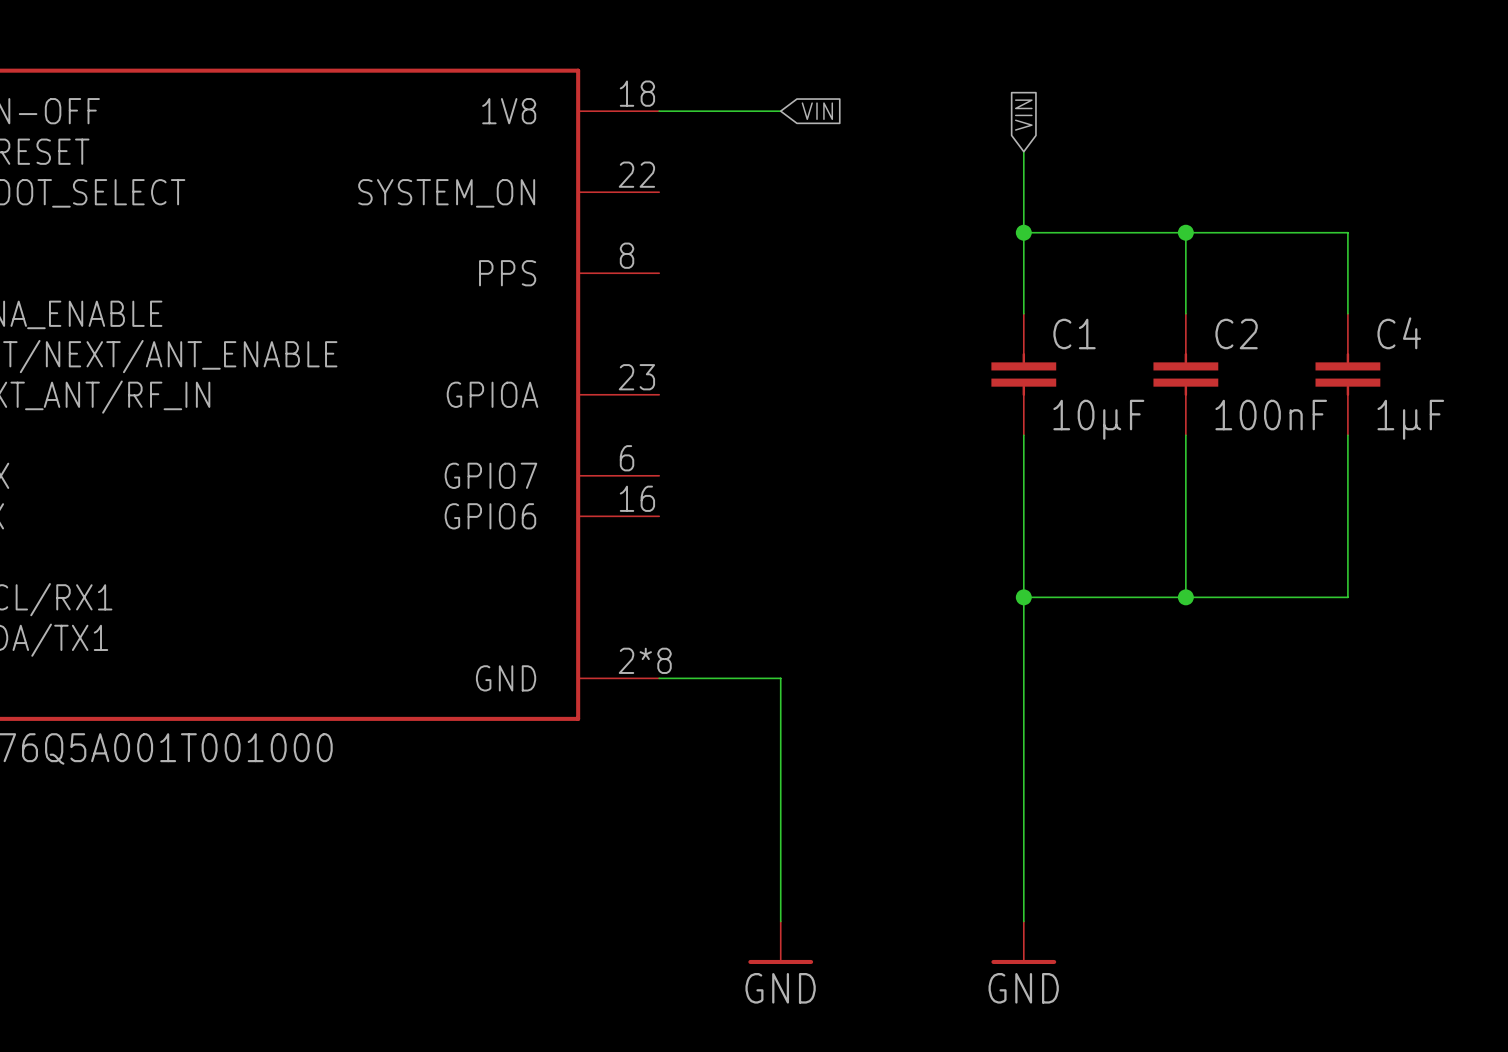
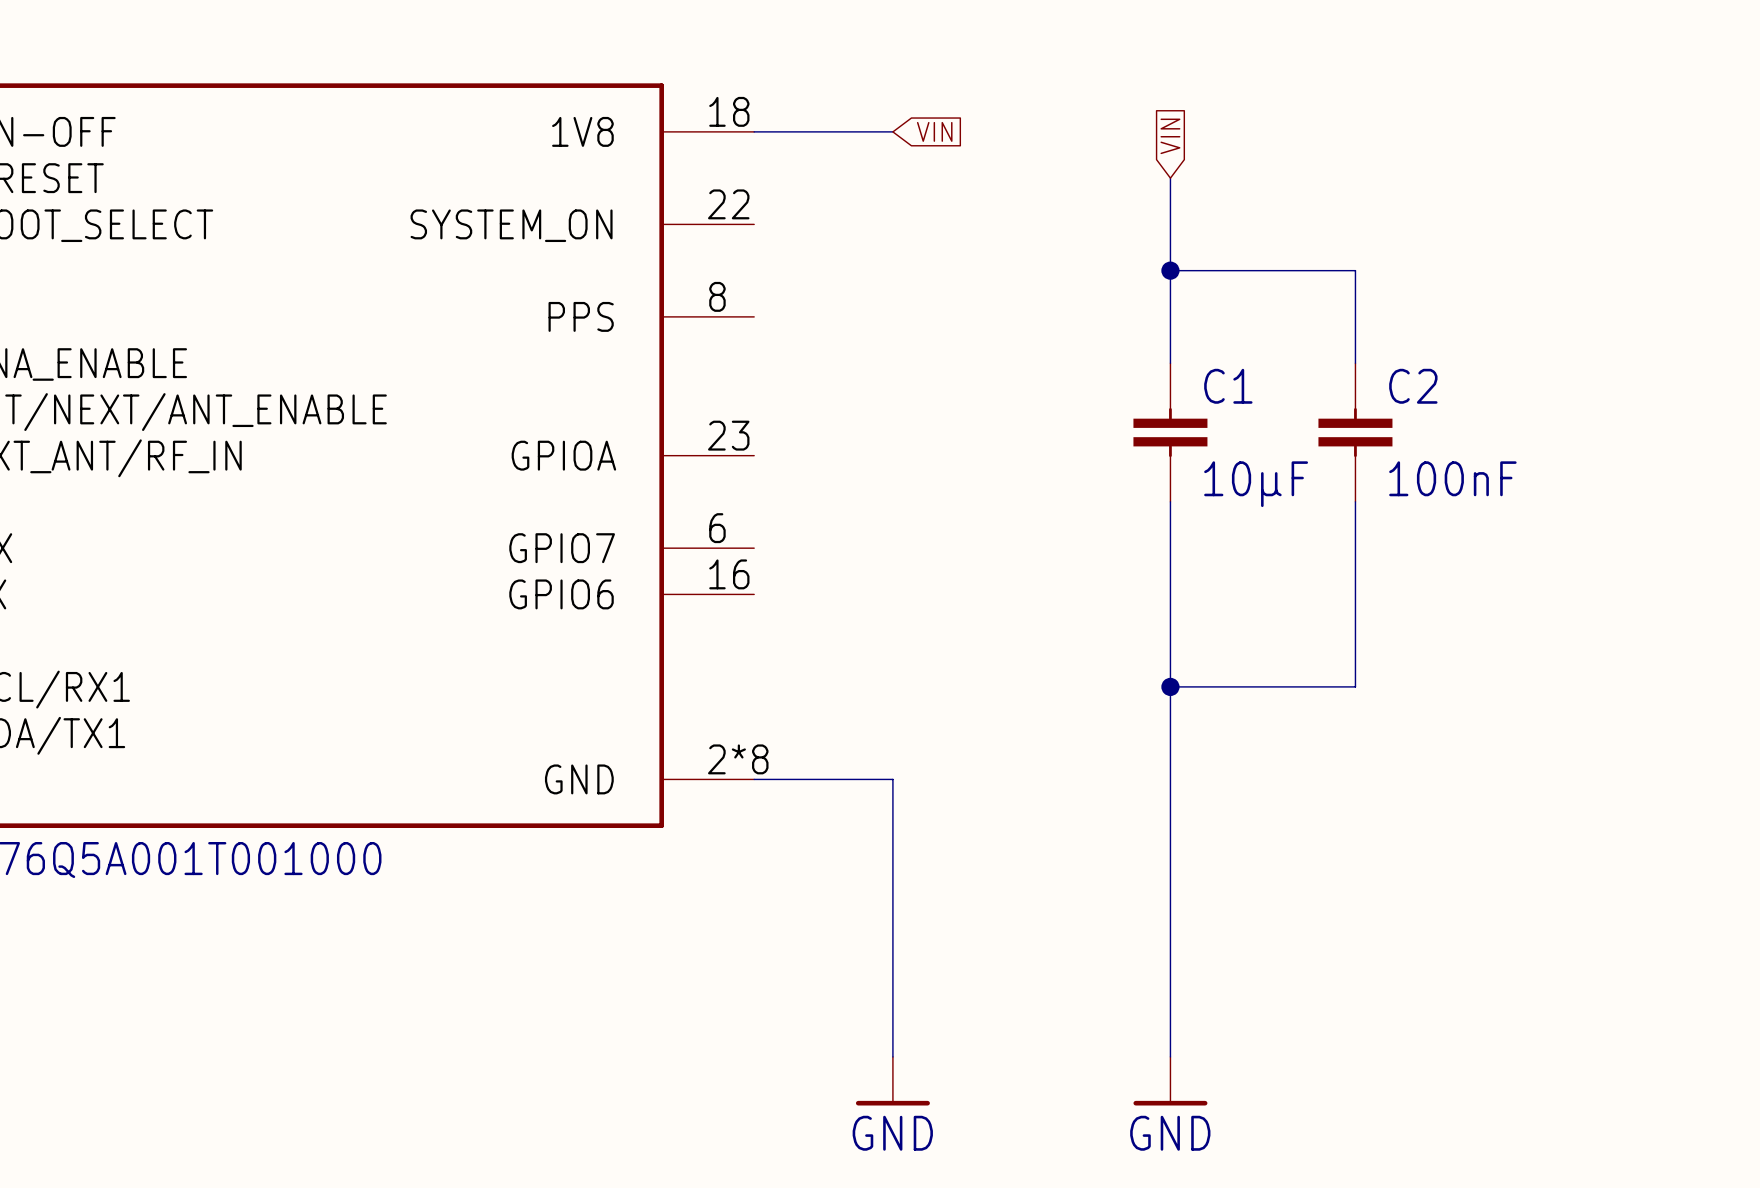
wire: (1185, 232) (1347, 232) (1347, 313) -> none
junction: (1185, 232) -> none
C4: 1µF (1347, 374) -> none
wire: (1347, 435) (1347, 597) (1185, 597) -> none
junction: (1185, 597) -> none

